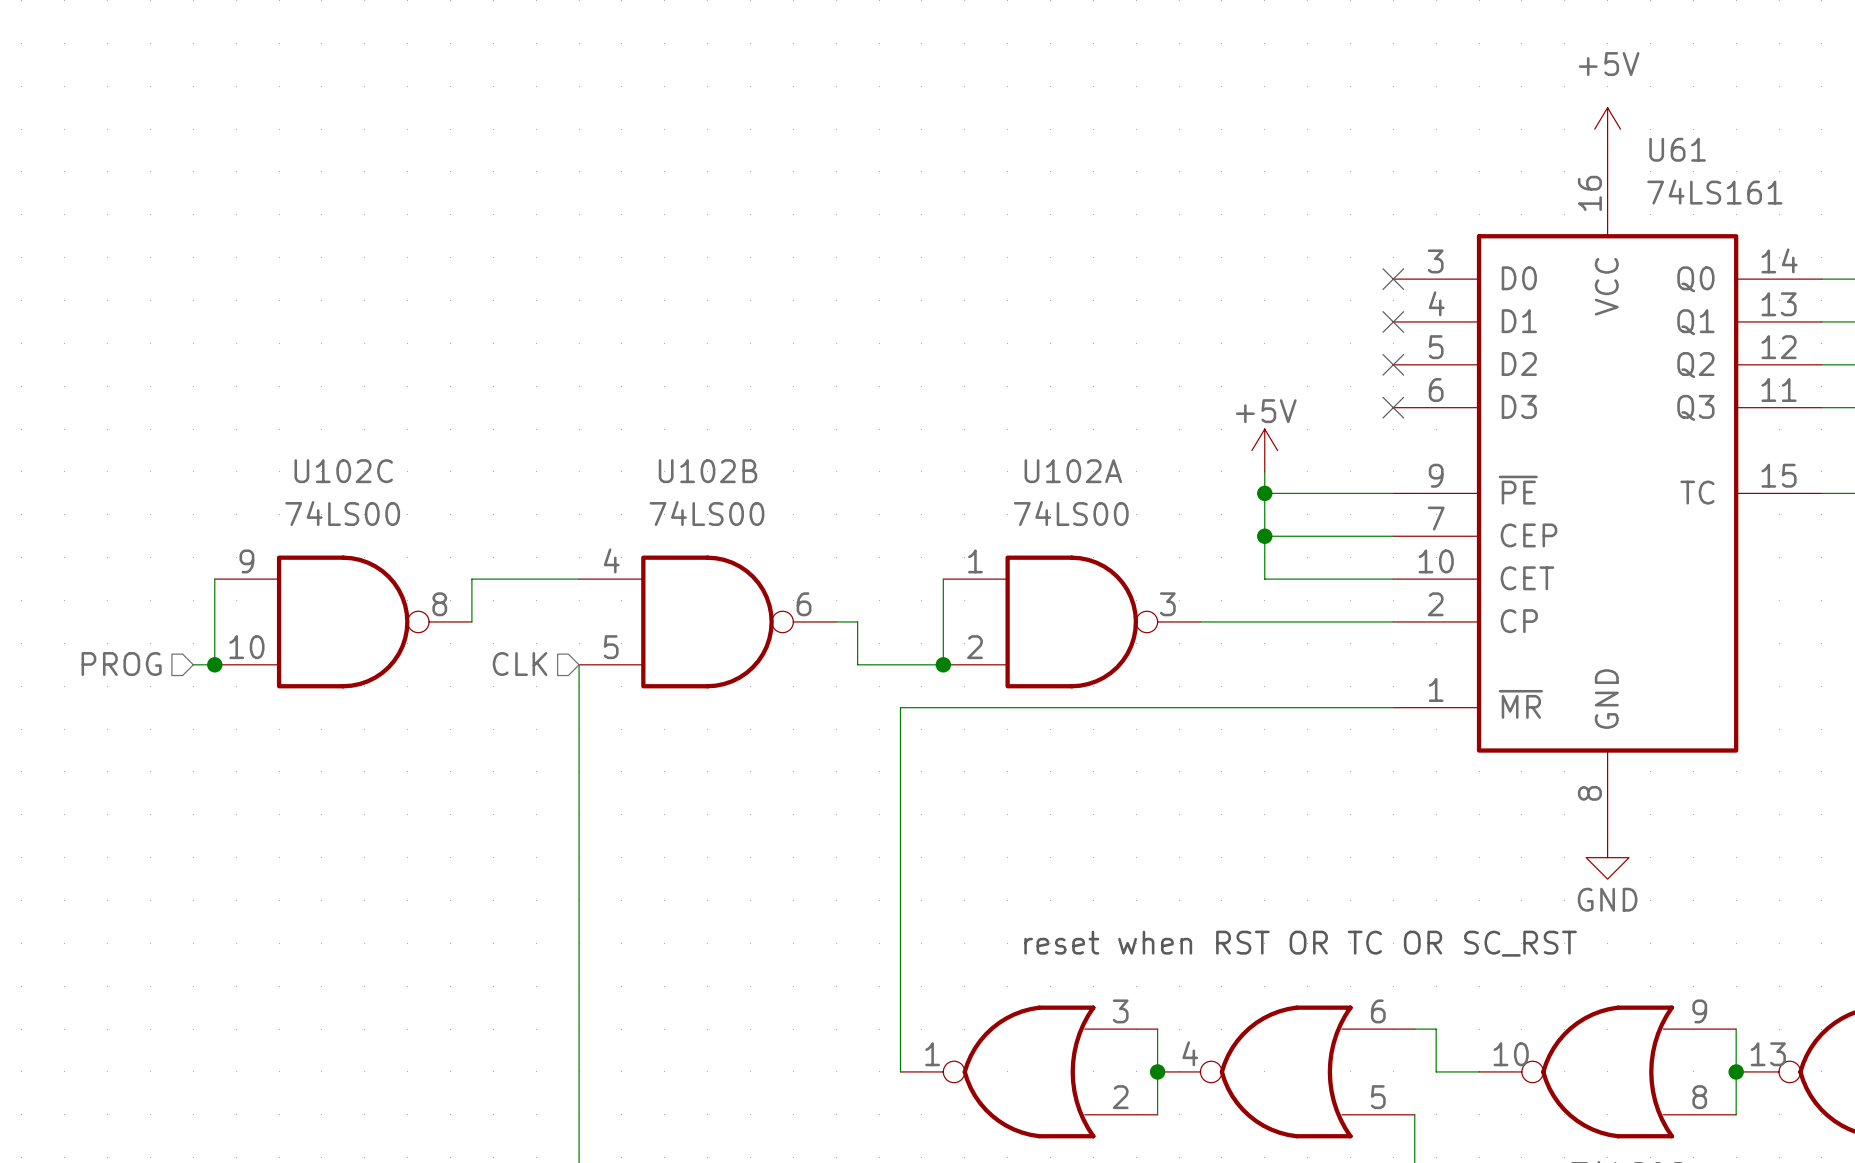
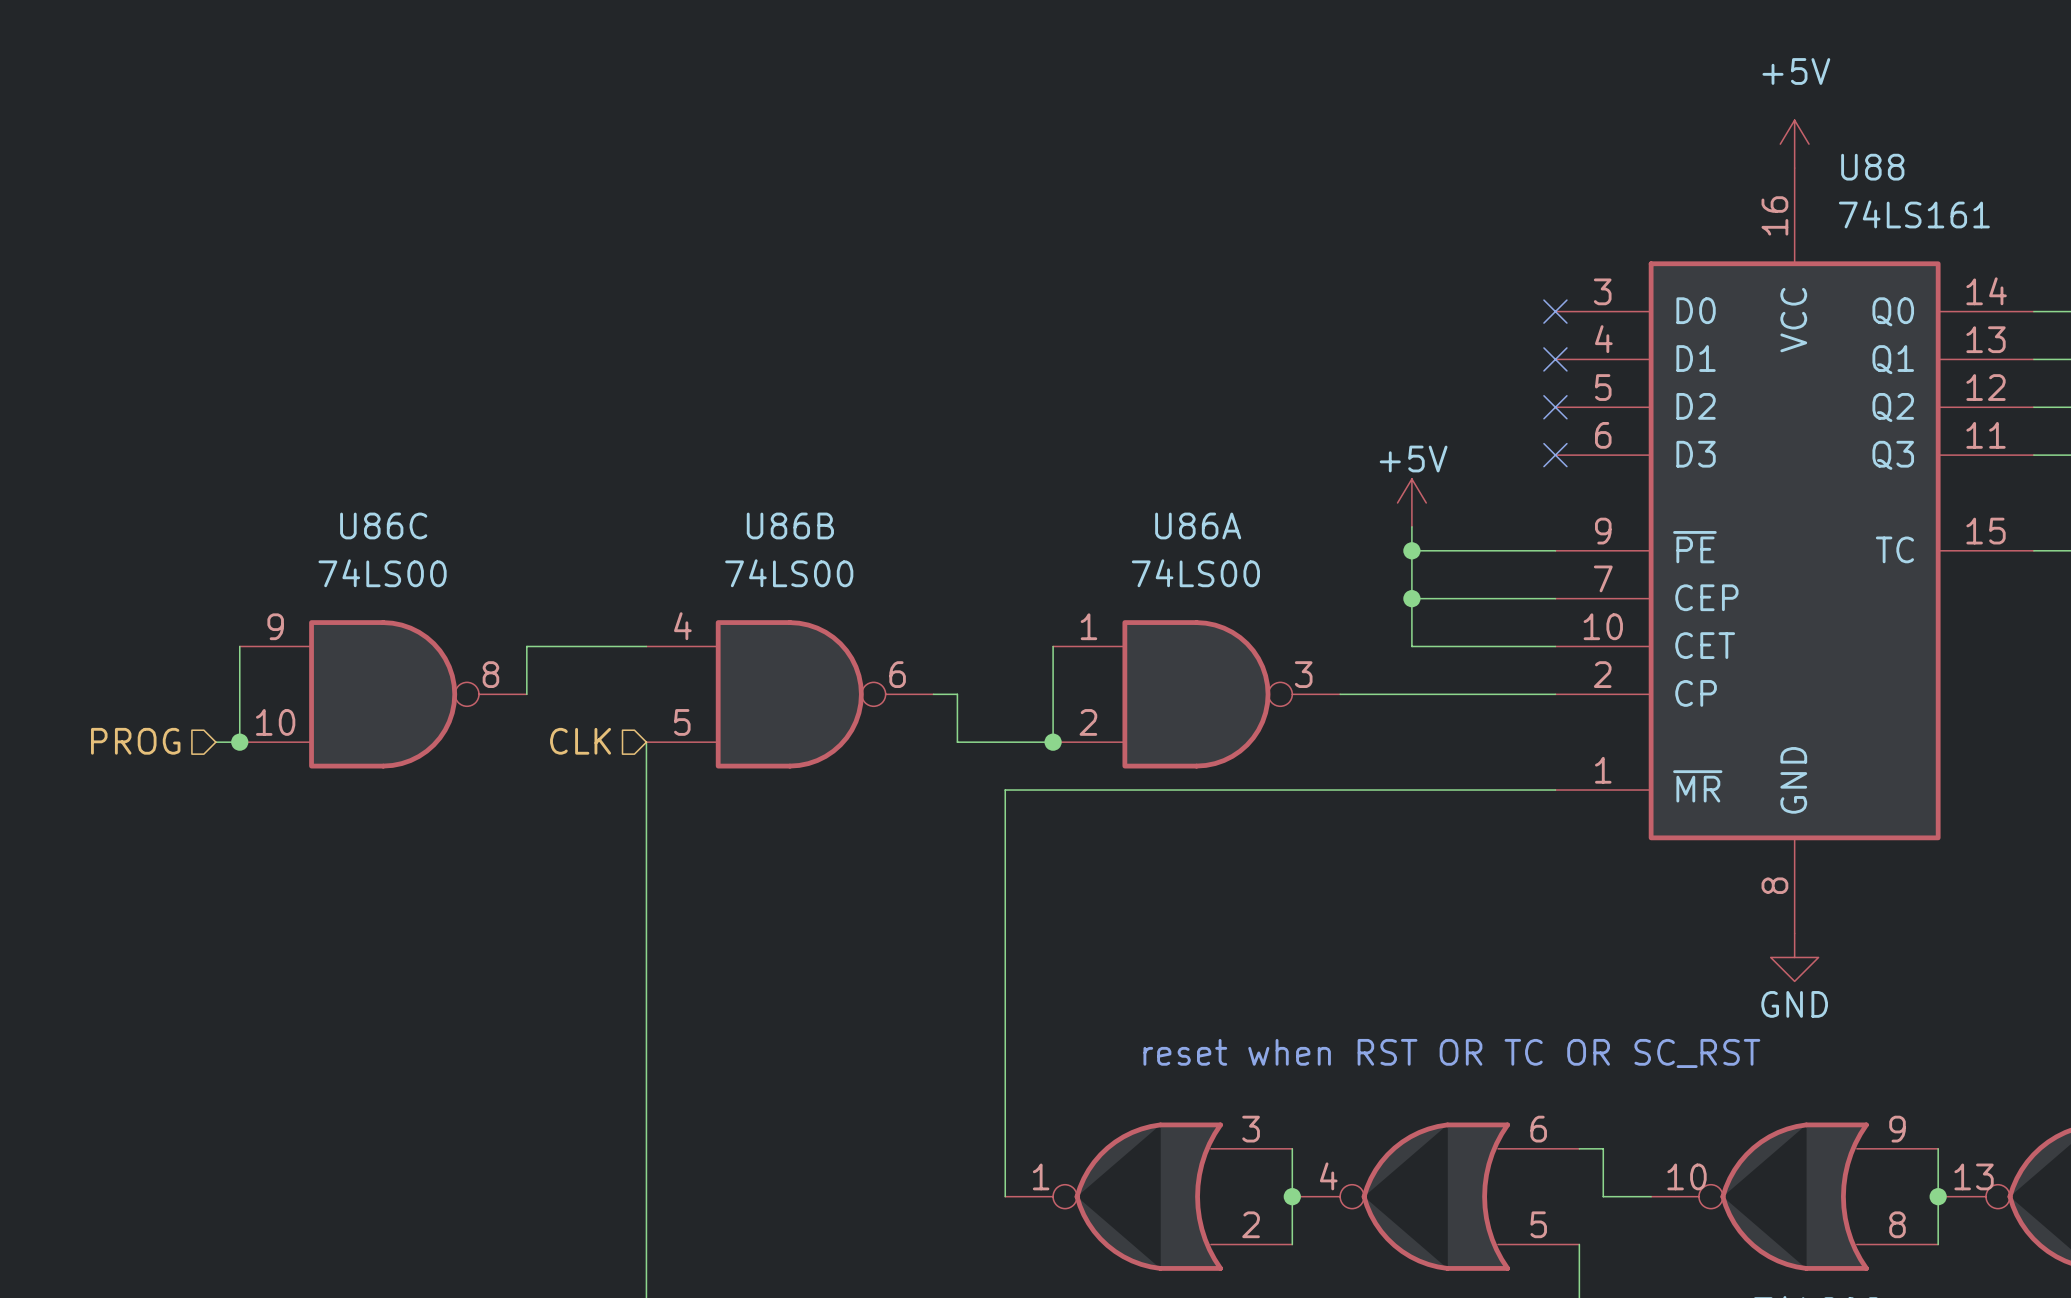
U61 name: U61 (1677, 149) -> U88 (1872, 167)
U102C name: U102C (343, 471) -> U86C (383, 525)
U102B name: U102B (707, 471) -> U86B (790, 525)
U102A name: U102A (1073, 471) -> U86A (1198, 525)

